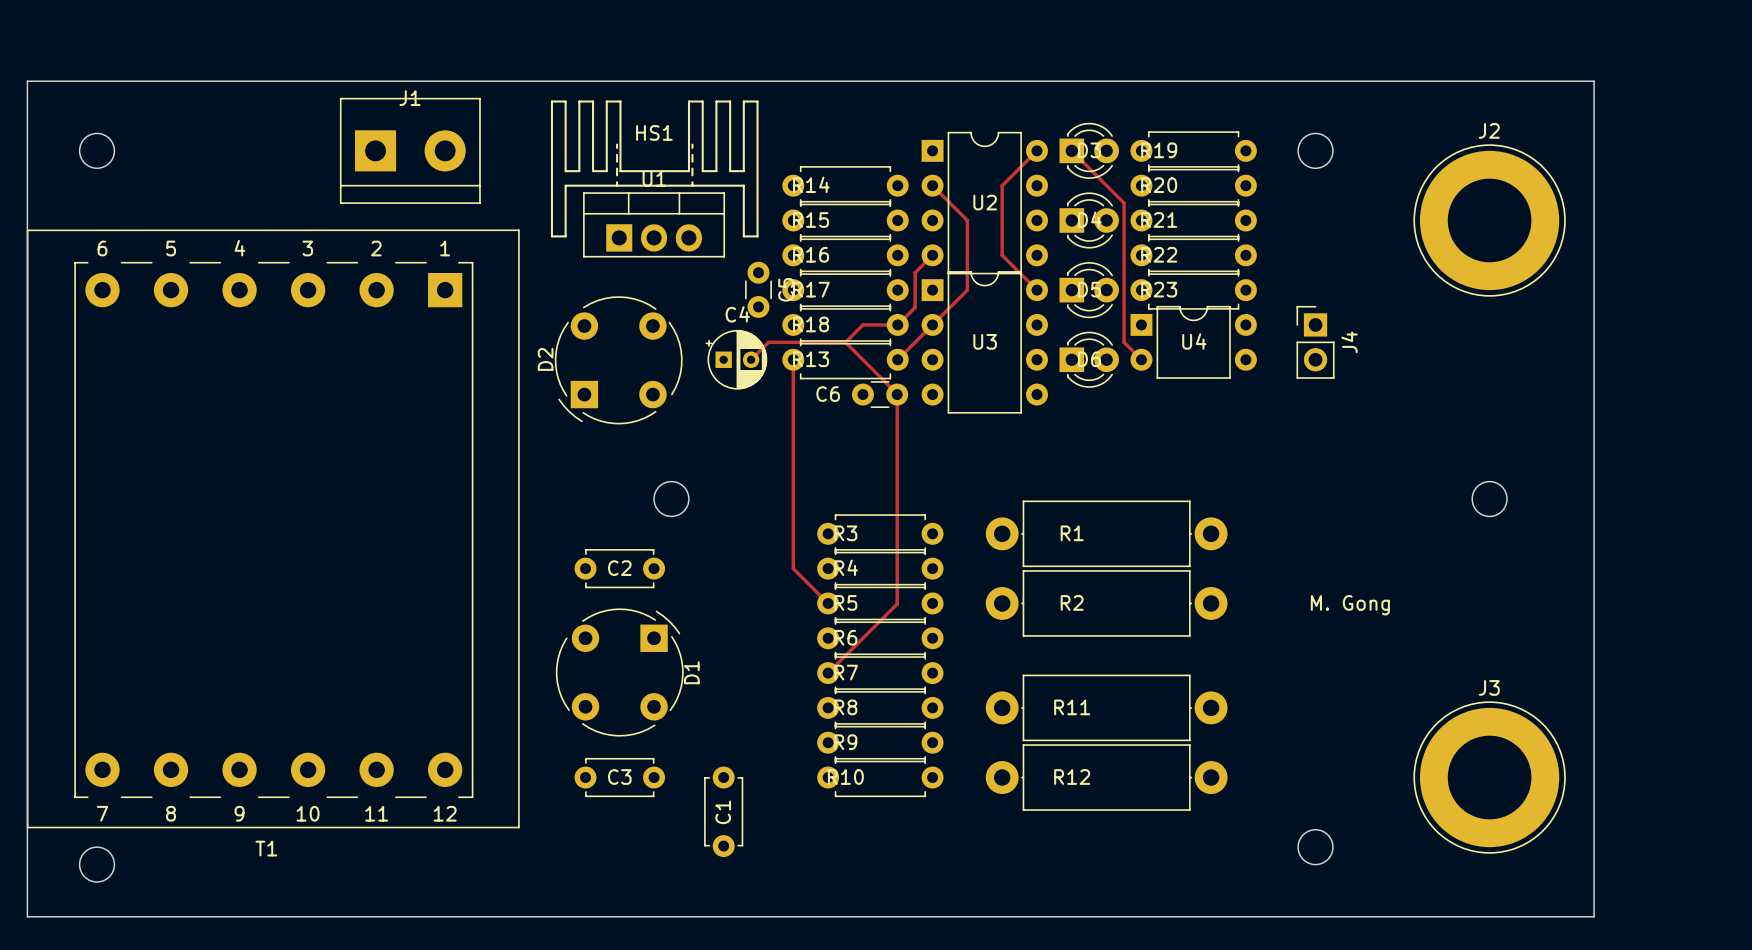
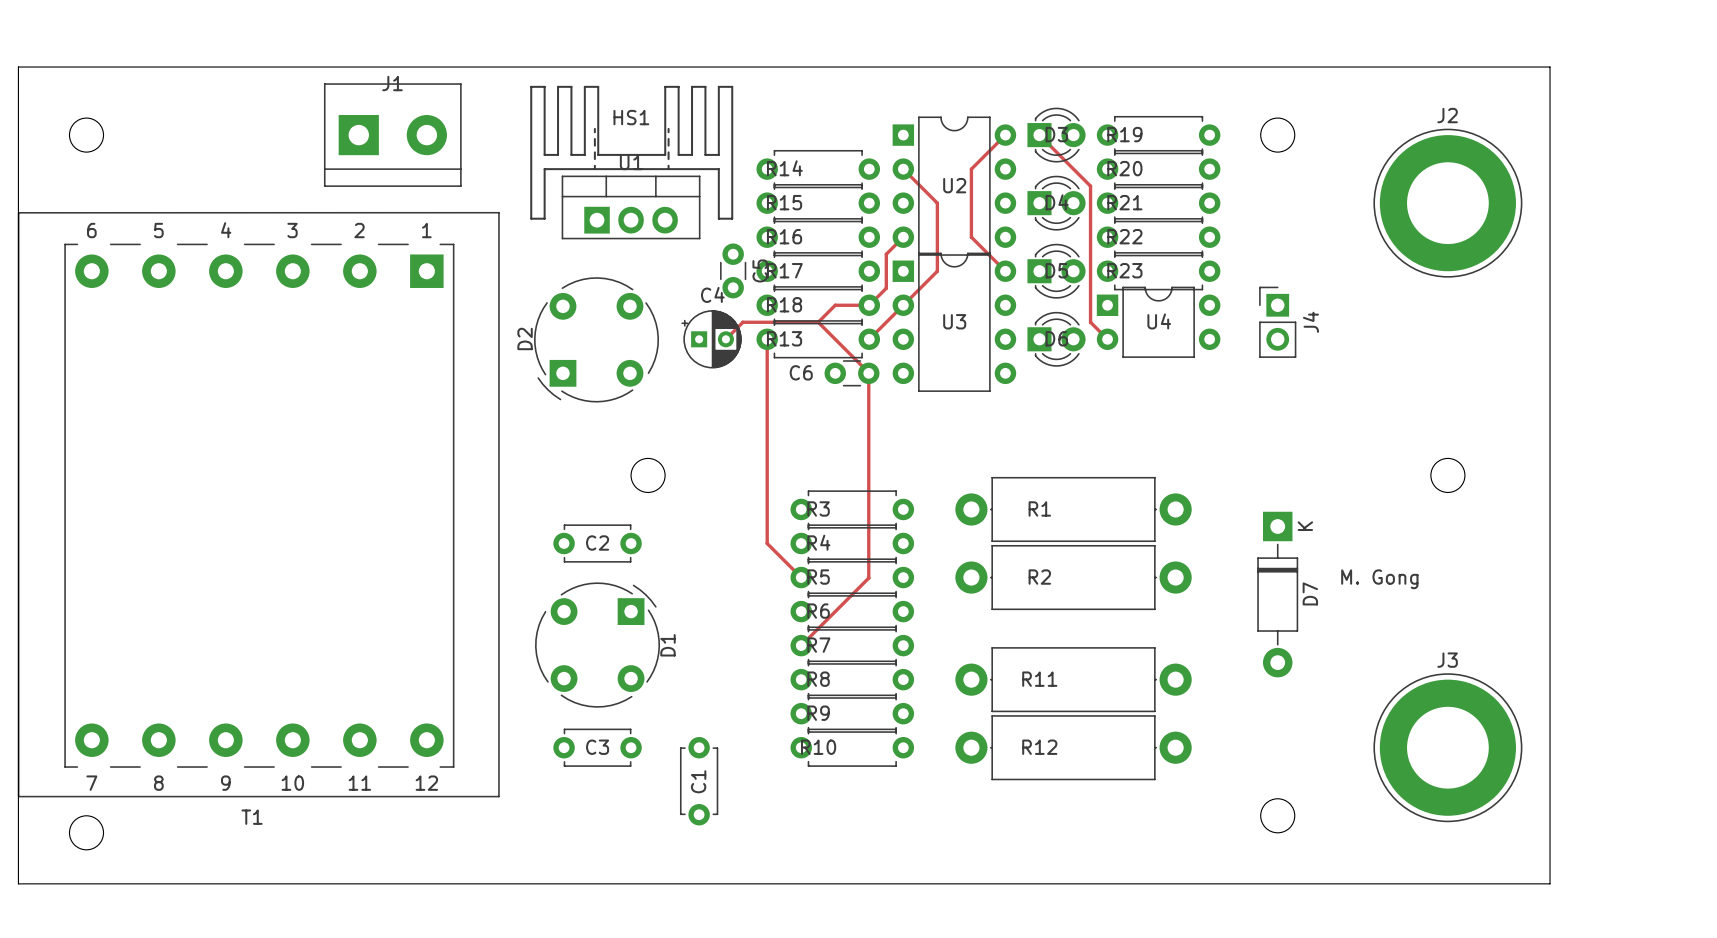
text position: M. Gong (1350, 605) -> M. Gong (1379, 579)
D7: none -> (1277, 594)

